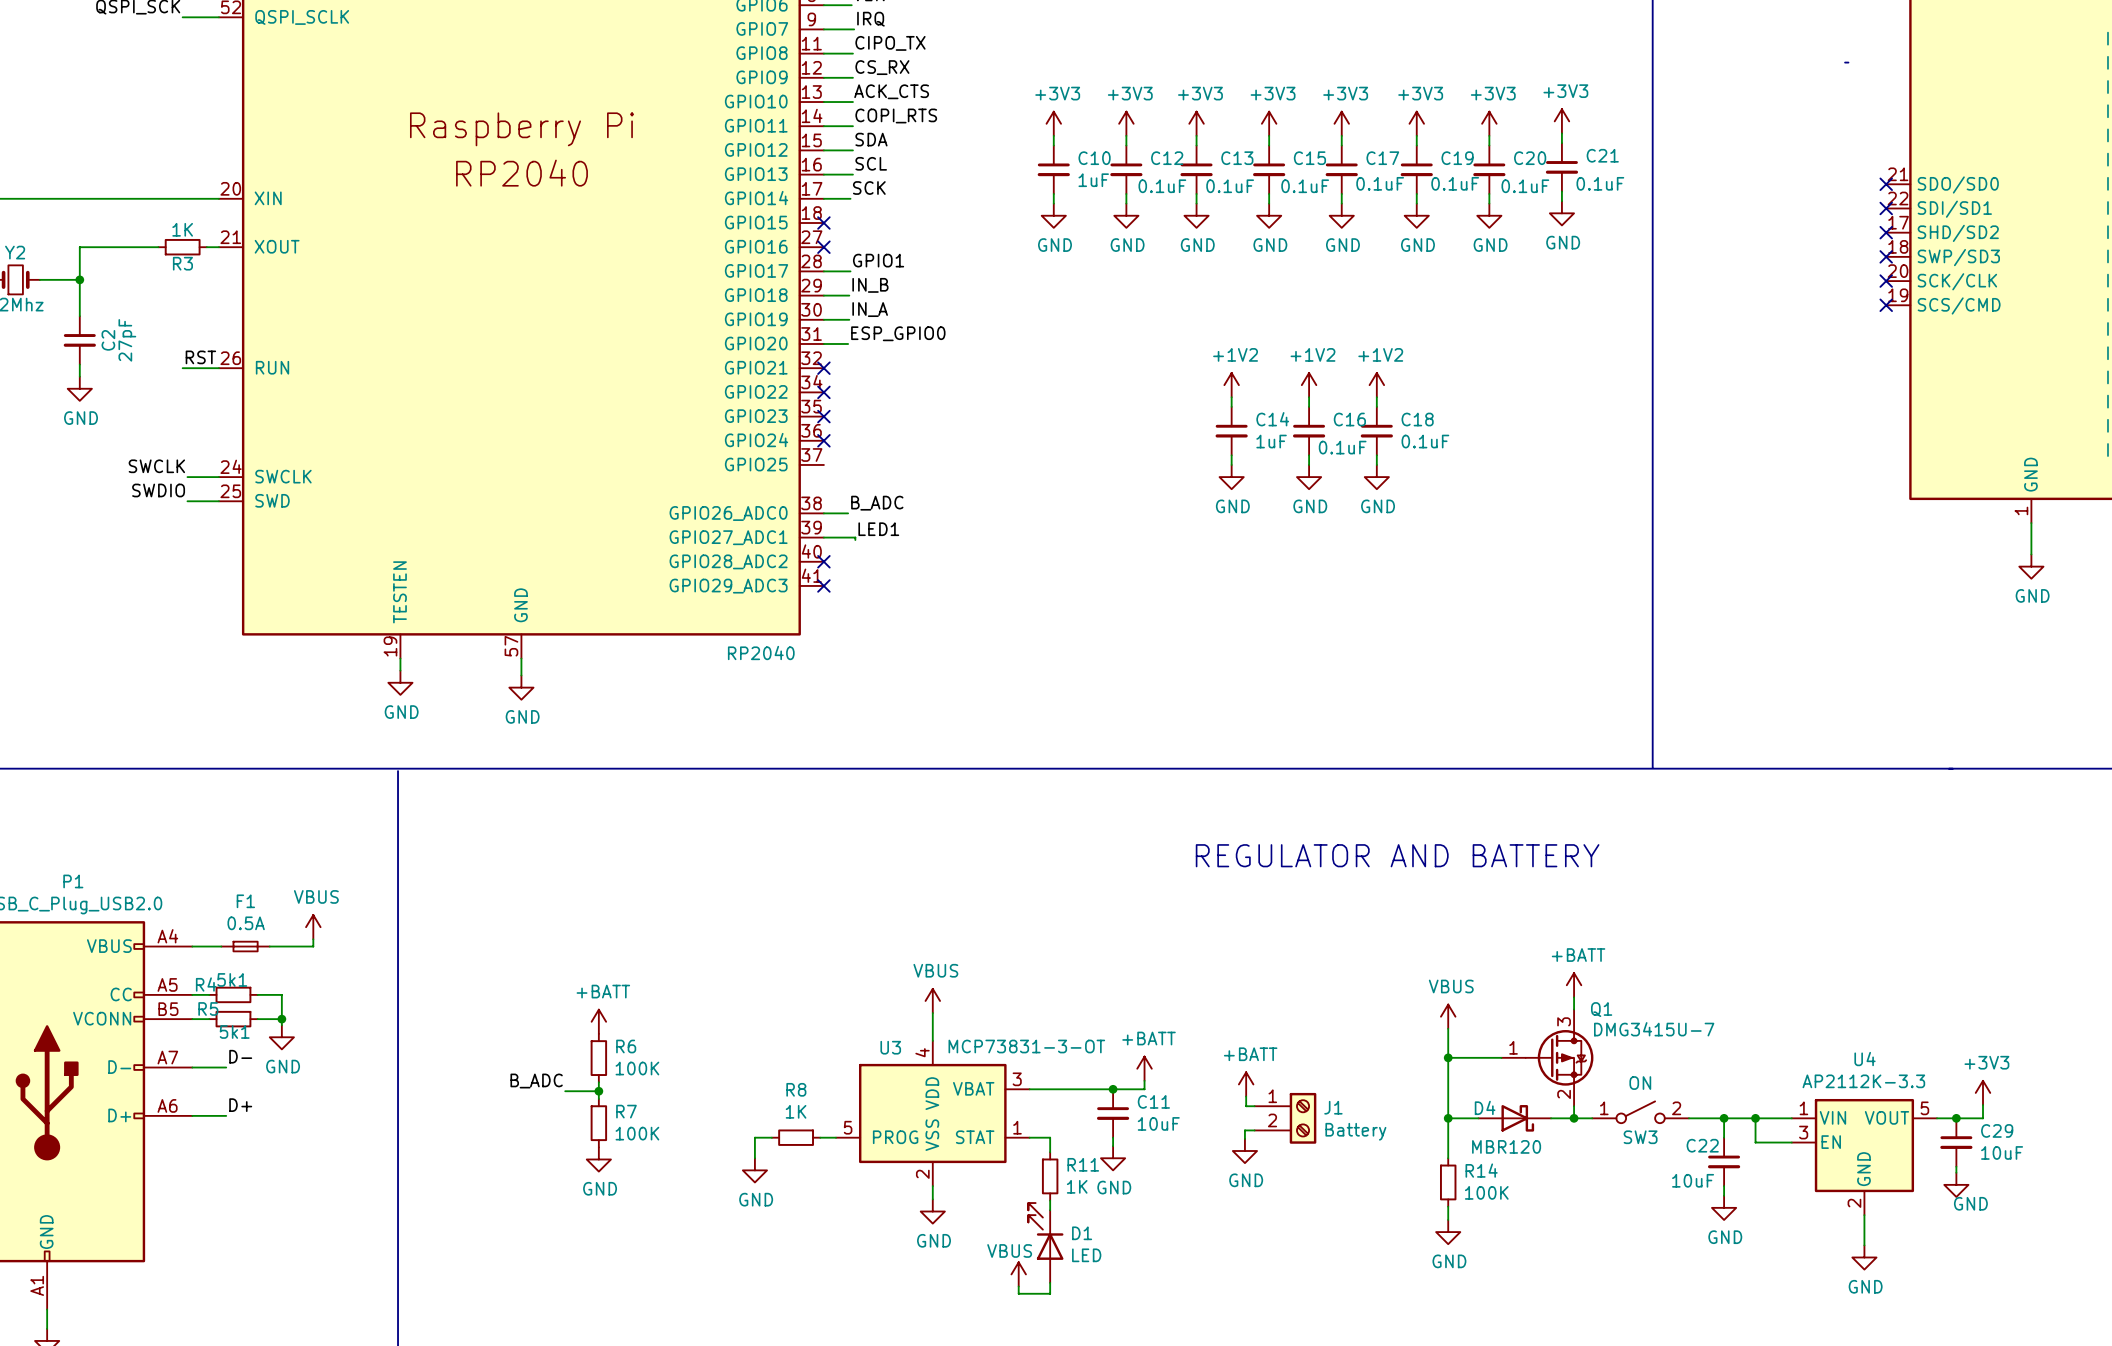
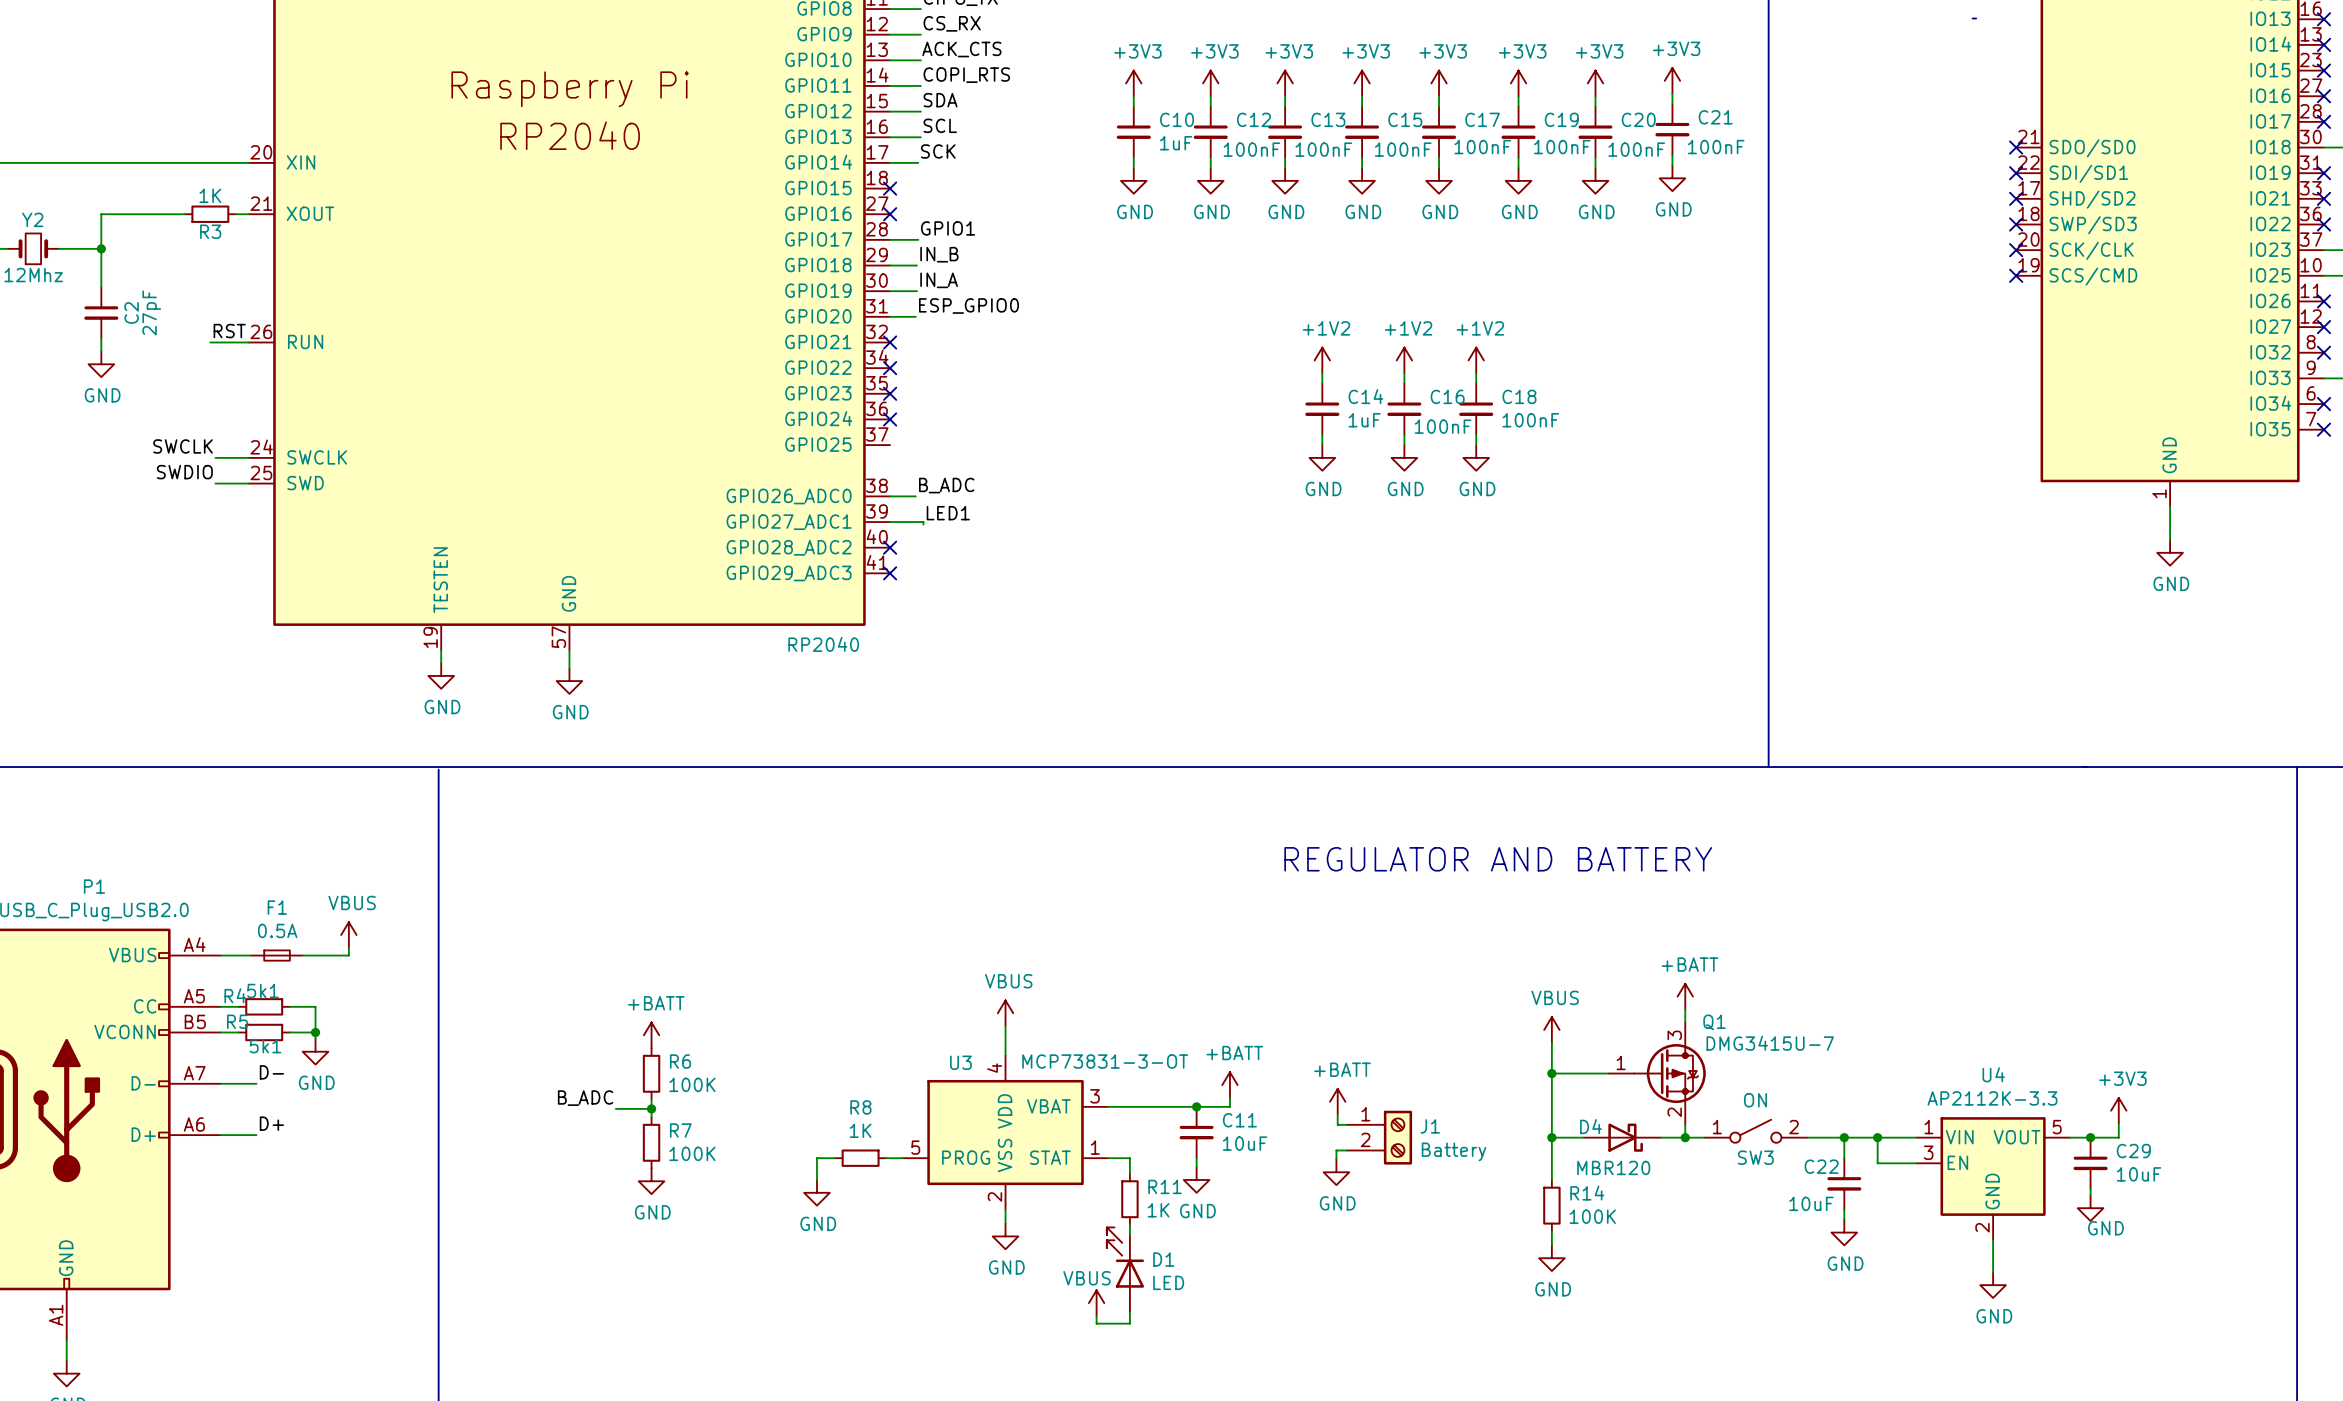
C17 value: 0.1uF (1380, 183) -> 100nF (1482, 147)
C19 value: 0.1uF (1455, 183) -> 100nF (1562, 147)
C21 value: 0.1uF (1600, 183) -> 100nF (1716, 147)
C12 value: 0.1uF (1162, 186) -> 100nF (1251, 149)
C13 value: 0.1uF (1230, 186) -> 100nF (1323, 149)
C15 value: 0.1uF (1305, 186) -> 100nF (1403, 149)
C20 value: 0.1uF (1525, 186) -> 100nF (1636, 149)
C18 value: 0.1uF (1425, 441) -> 100nF (1530, 420)
C16 value: 0.1uF (1342, 447) -> 100nF (1443, 426)

